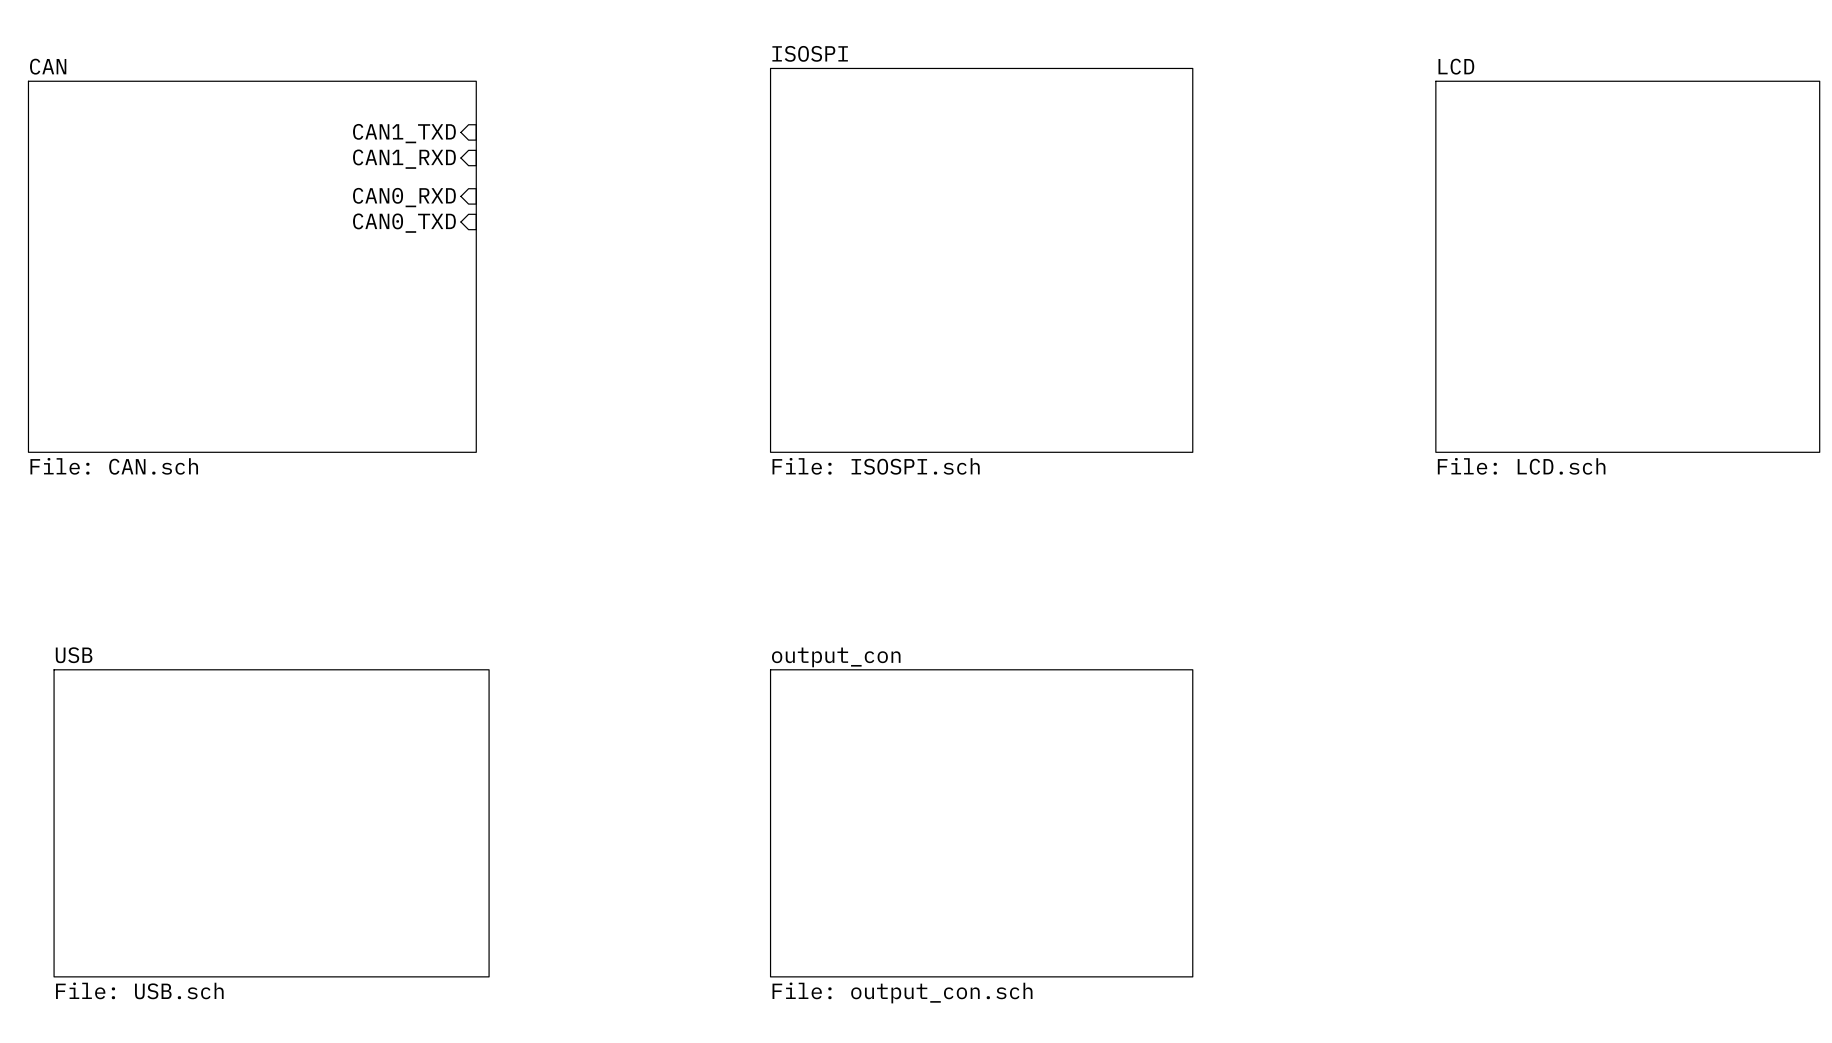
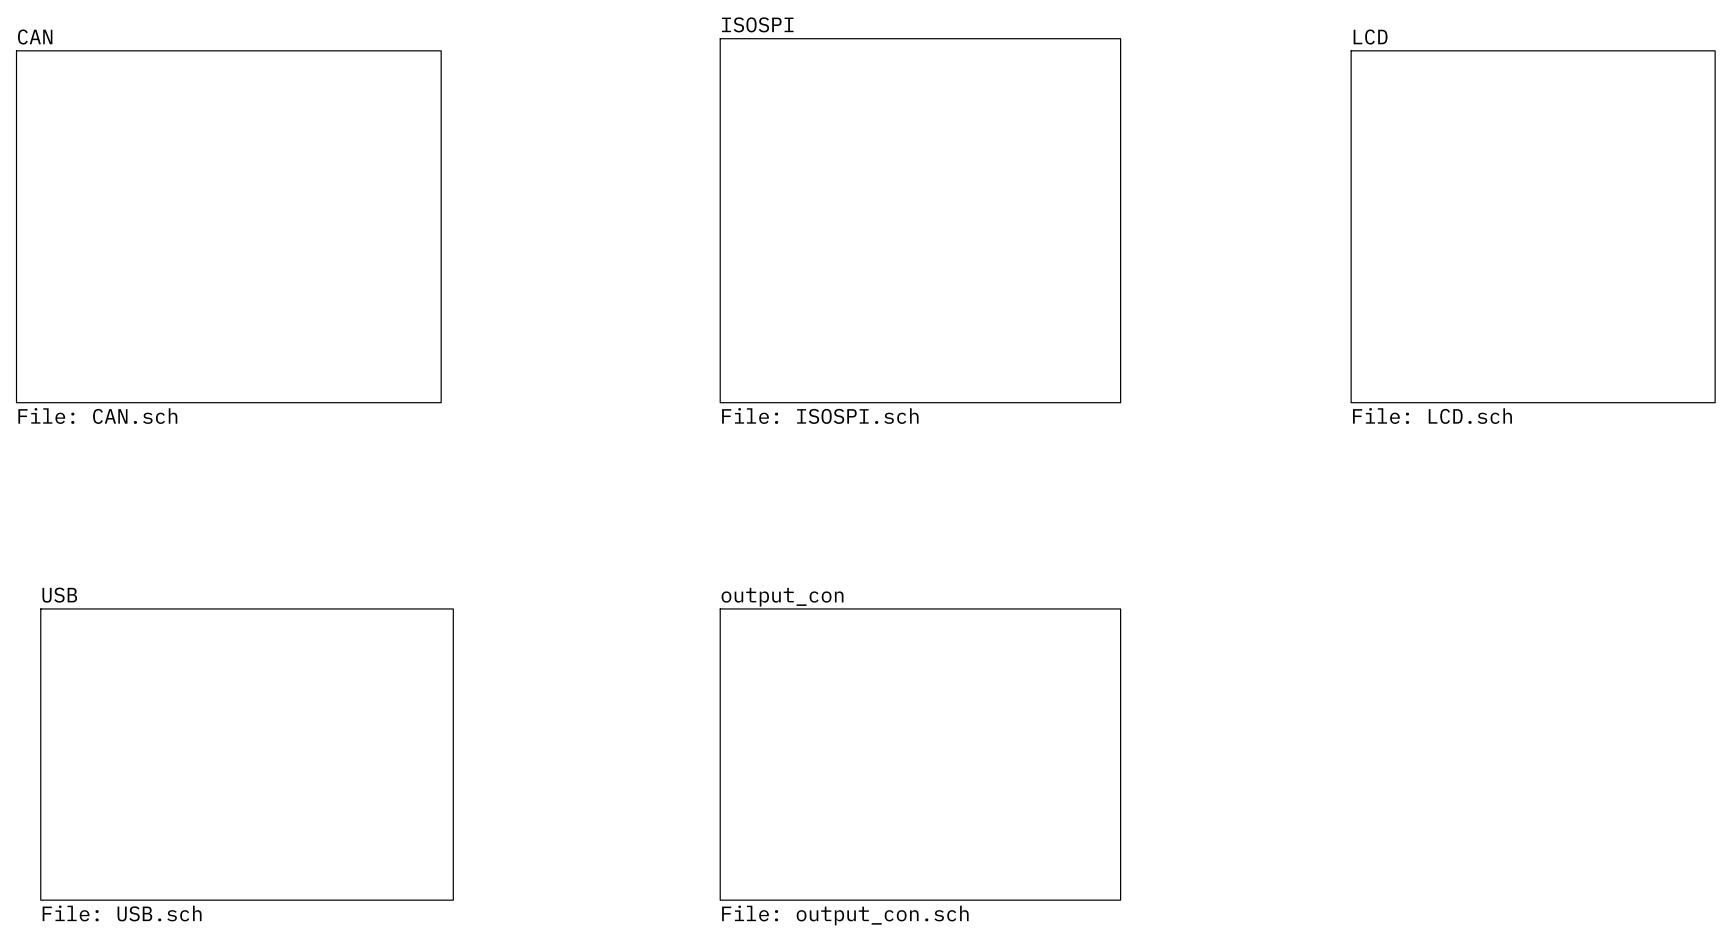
sheet pin: CAN1_TXD (404, 133) -> none
sheet pin: CAN1_RXD (404, 159) -> none
sheet pin: CAN0_RXD (404, 197) -> none
sheet pin: CAN0_TXD (404, 223) -> none

